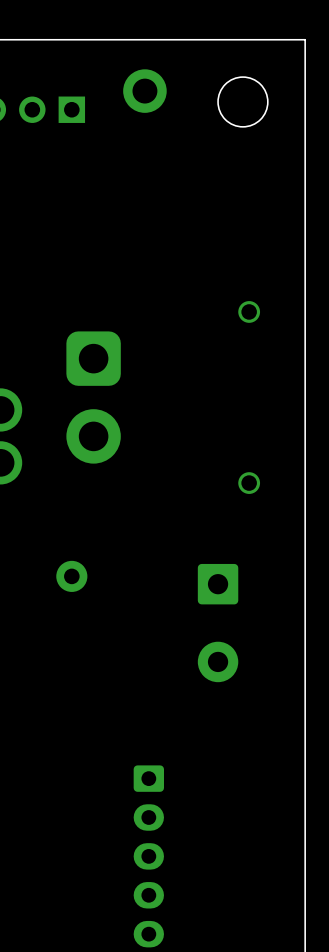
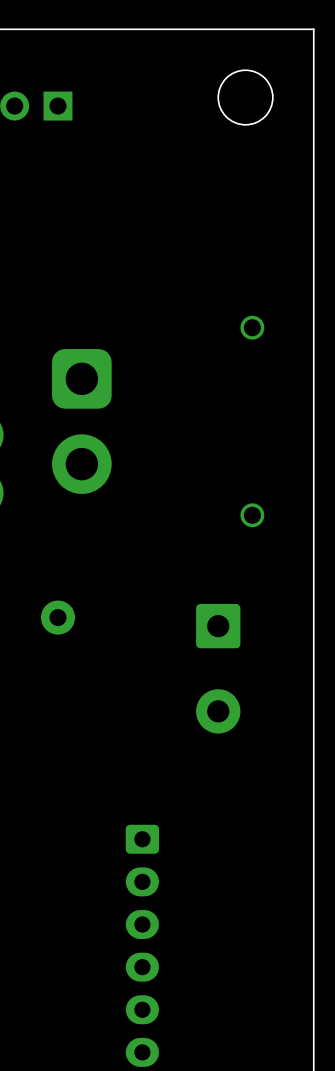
part: (144, 91) -> none

